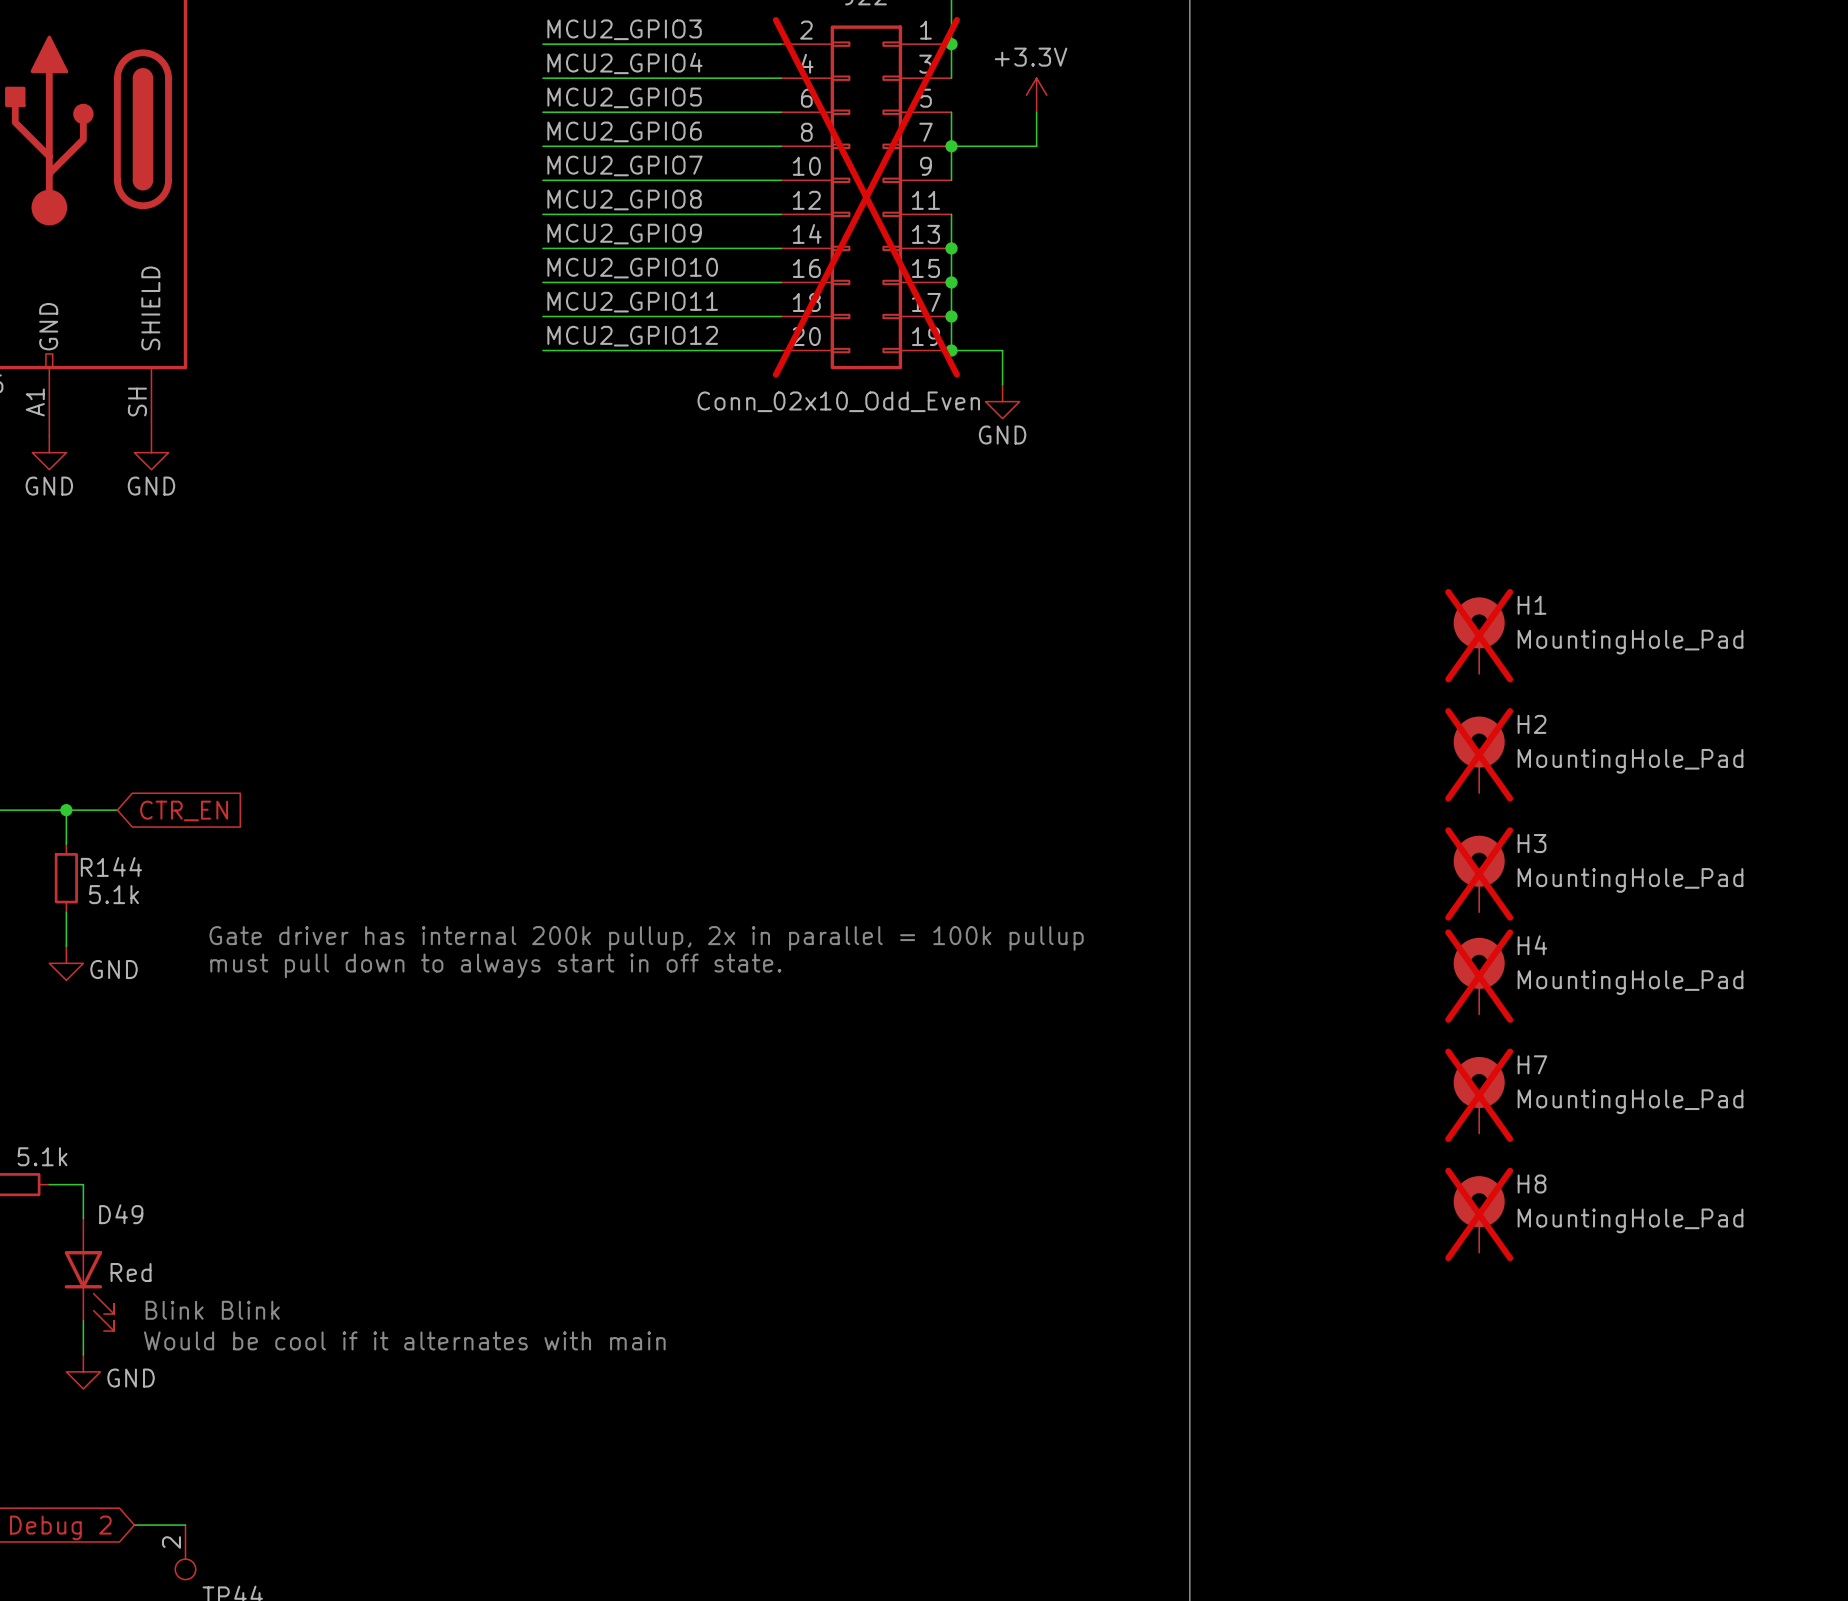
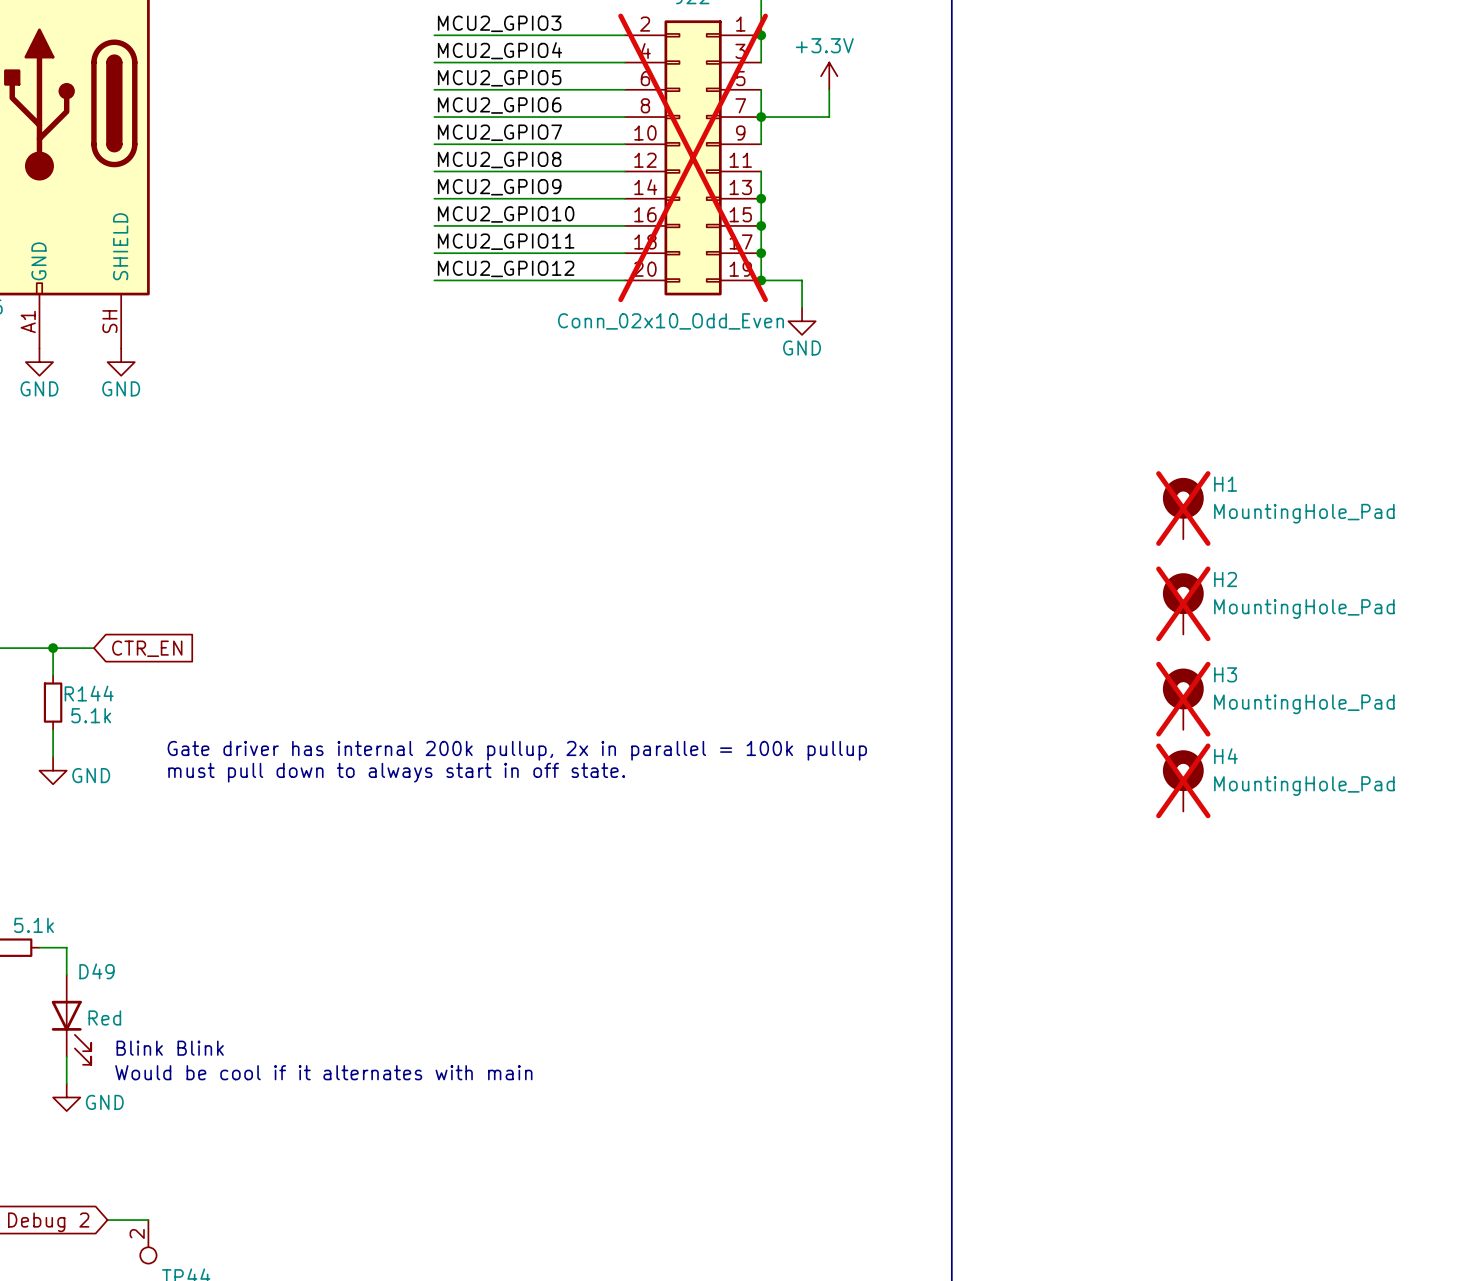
H7: MountingHole_Pad (1479, 1095) -> none
H8: MountingHole_Pad (1479, 1214) -> none

